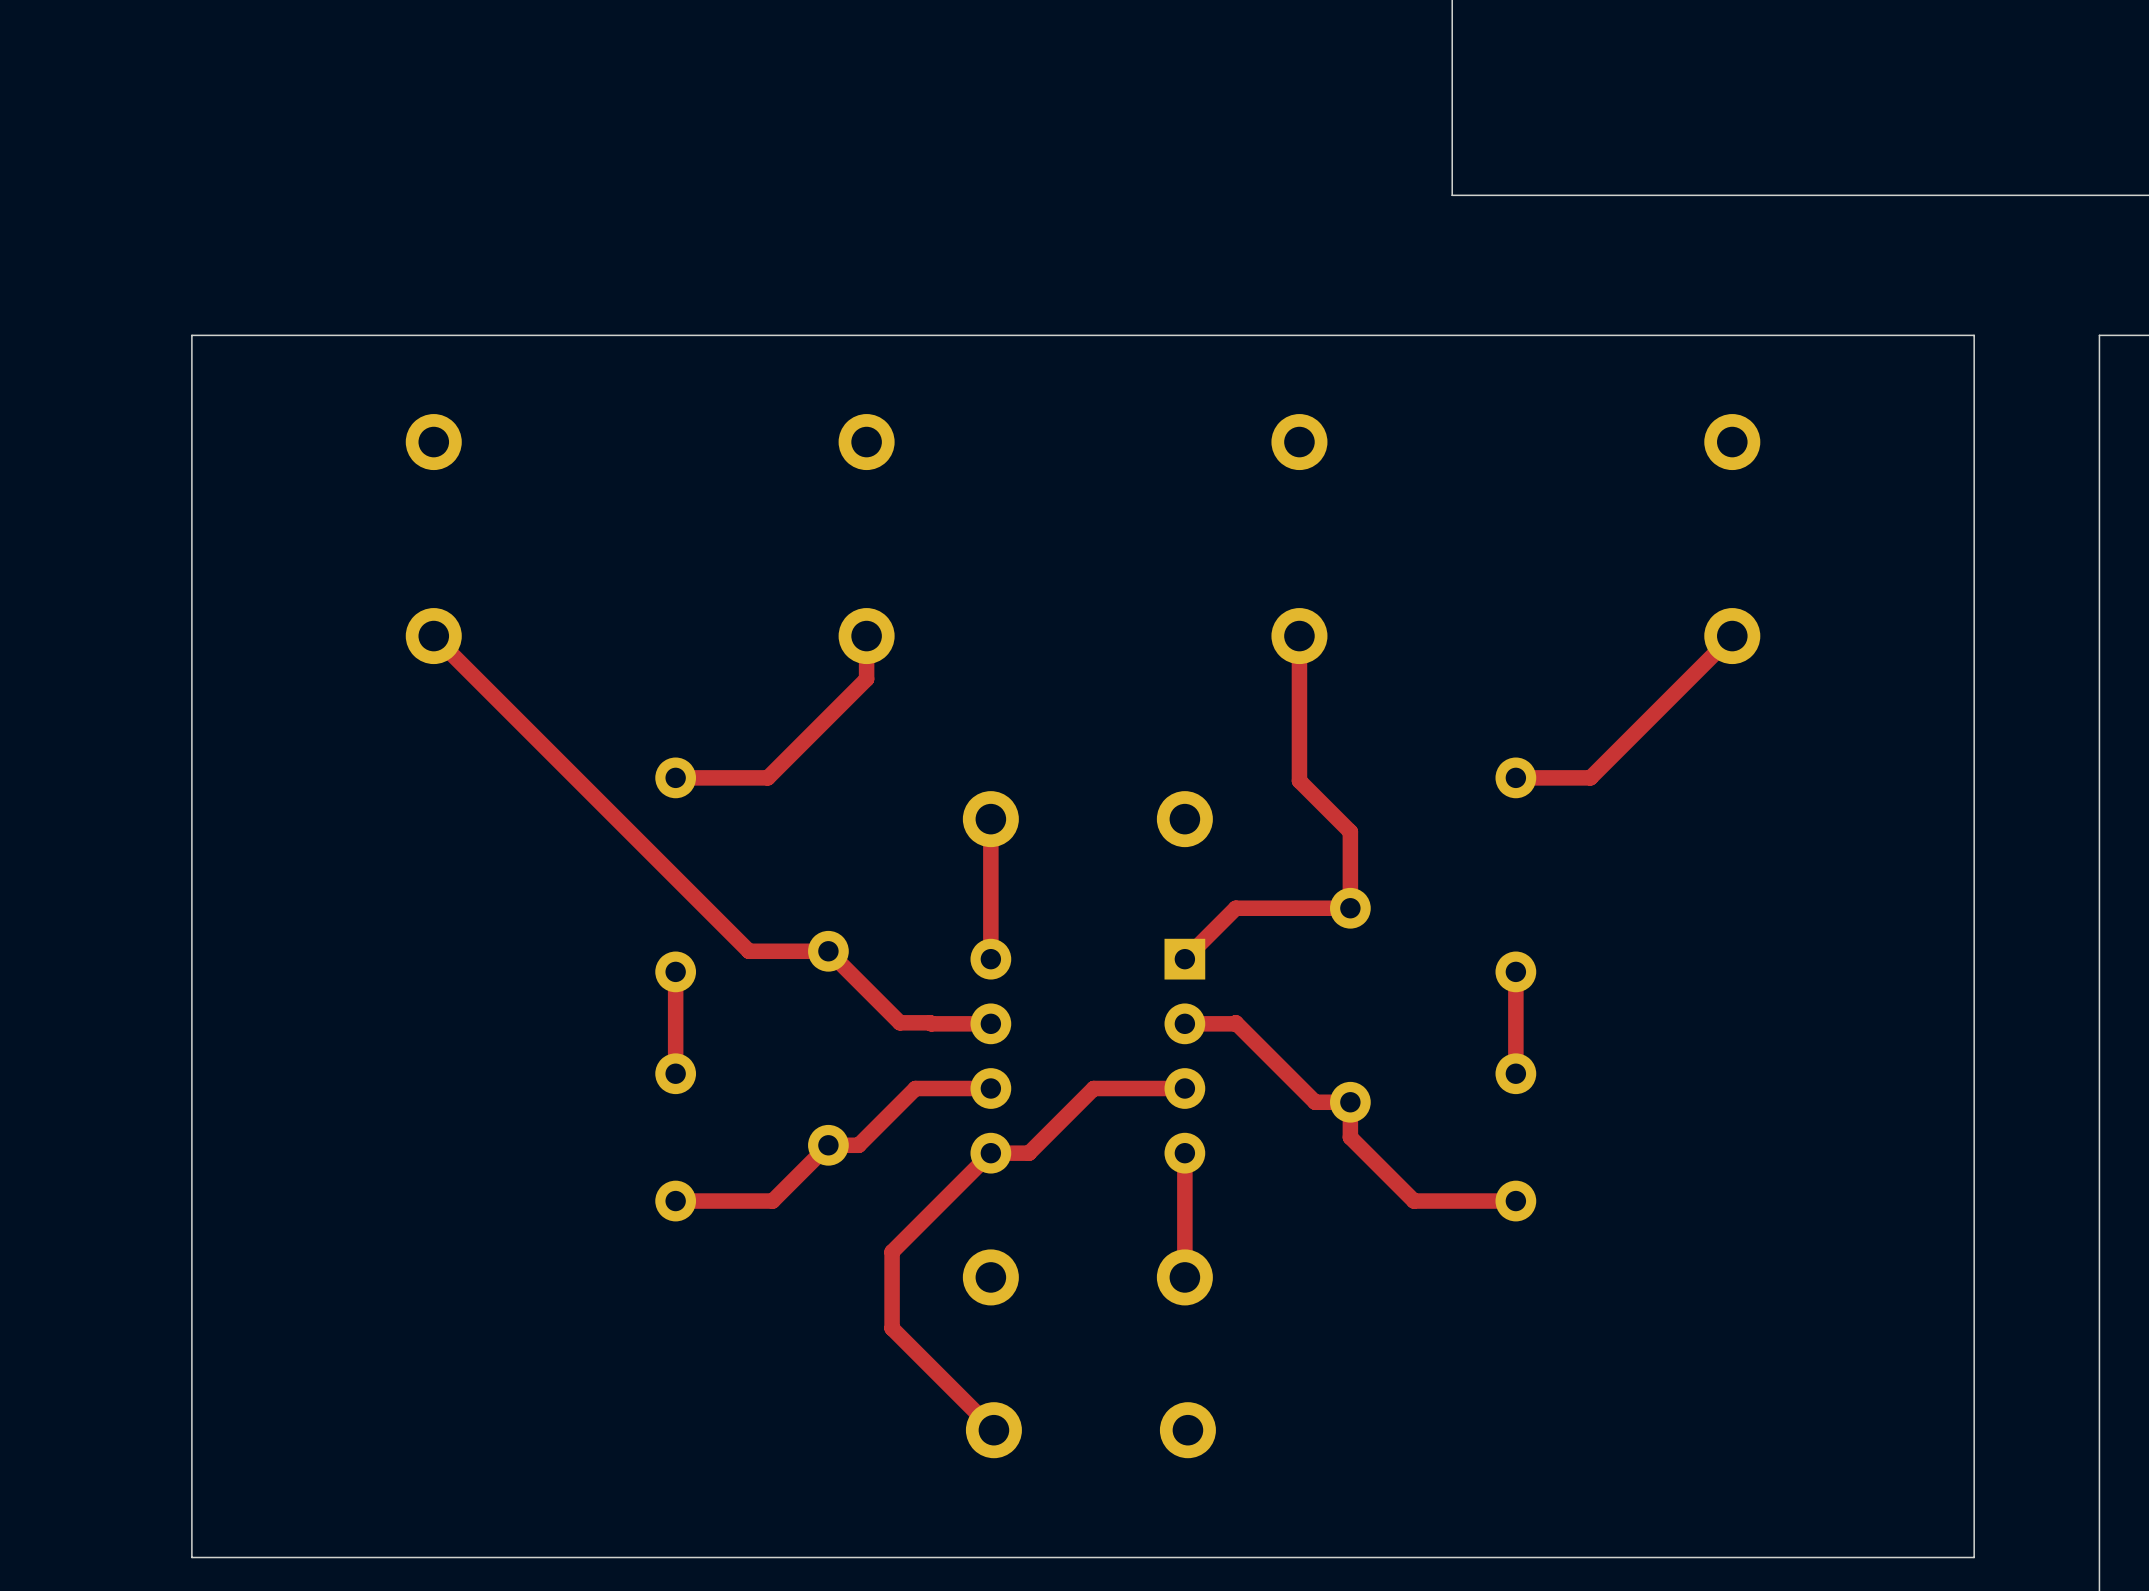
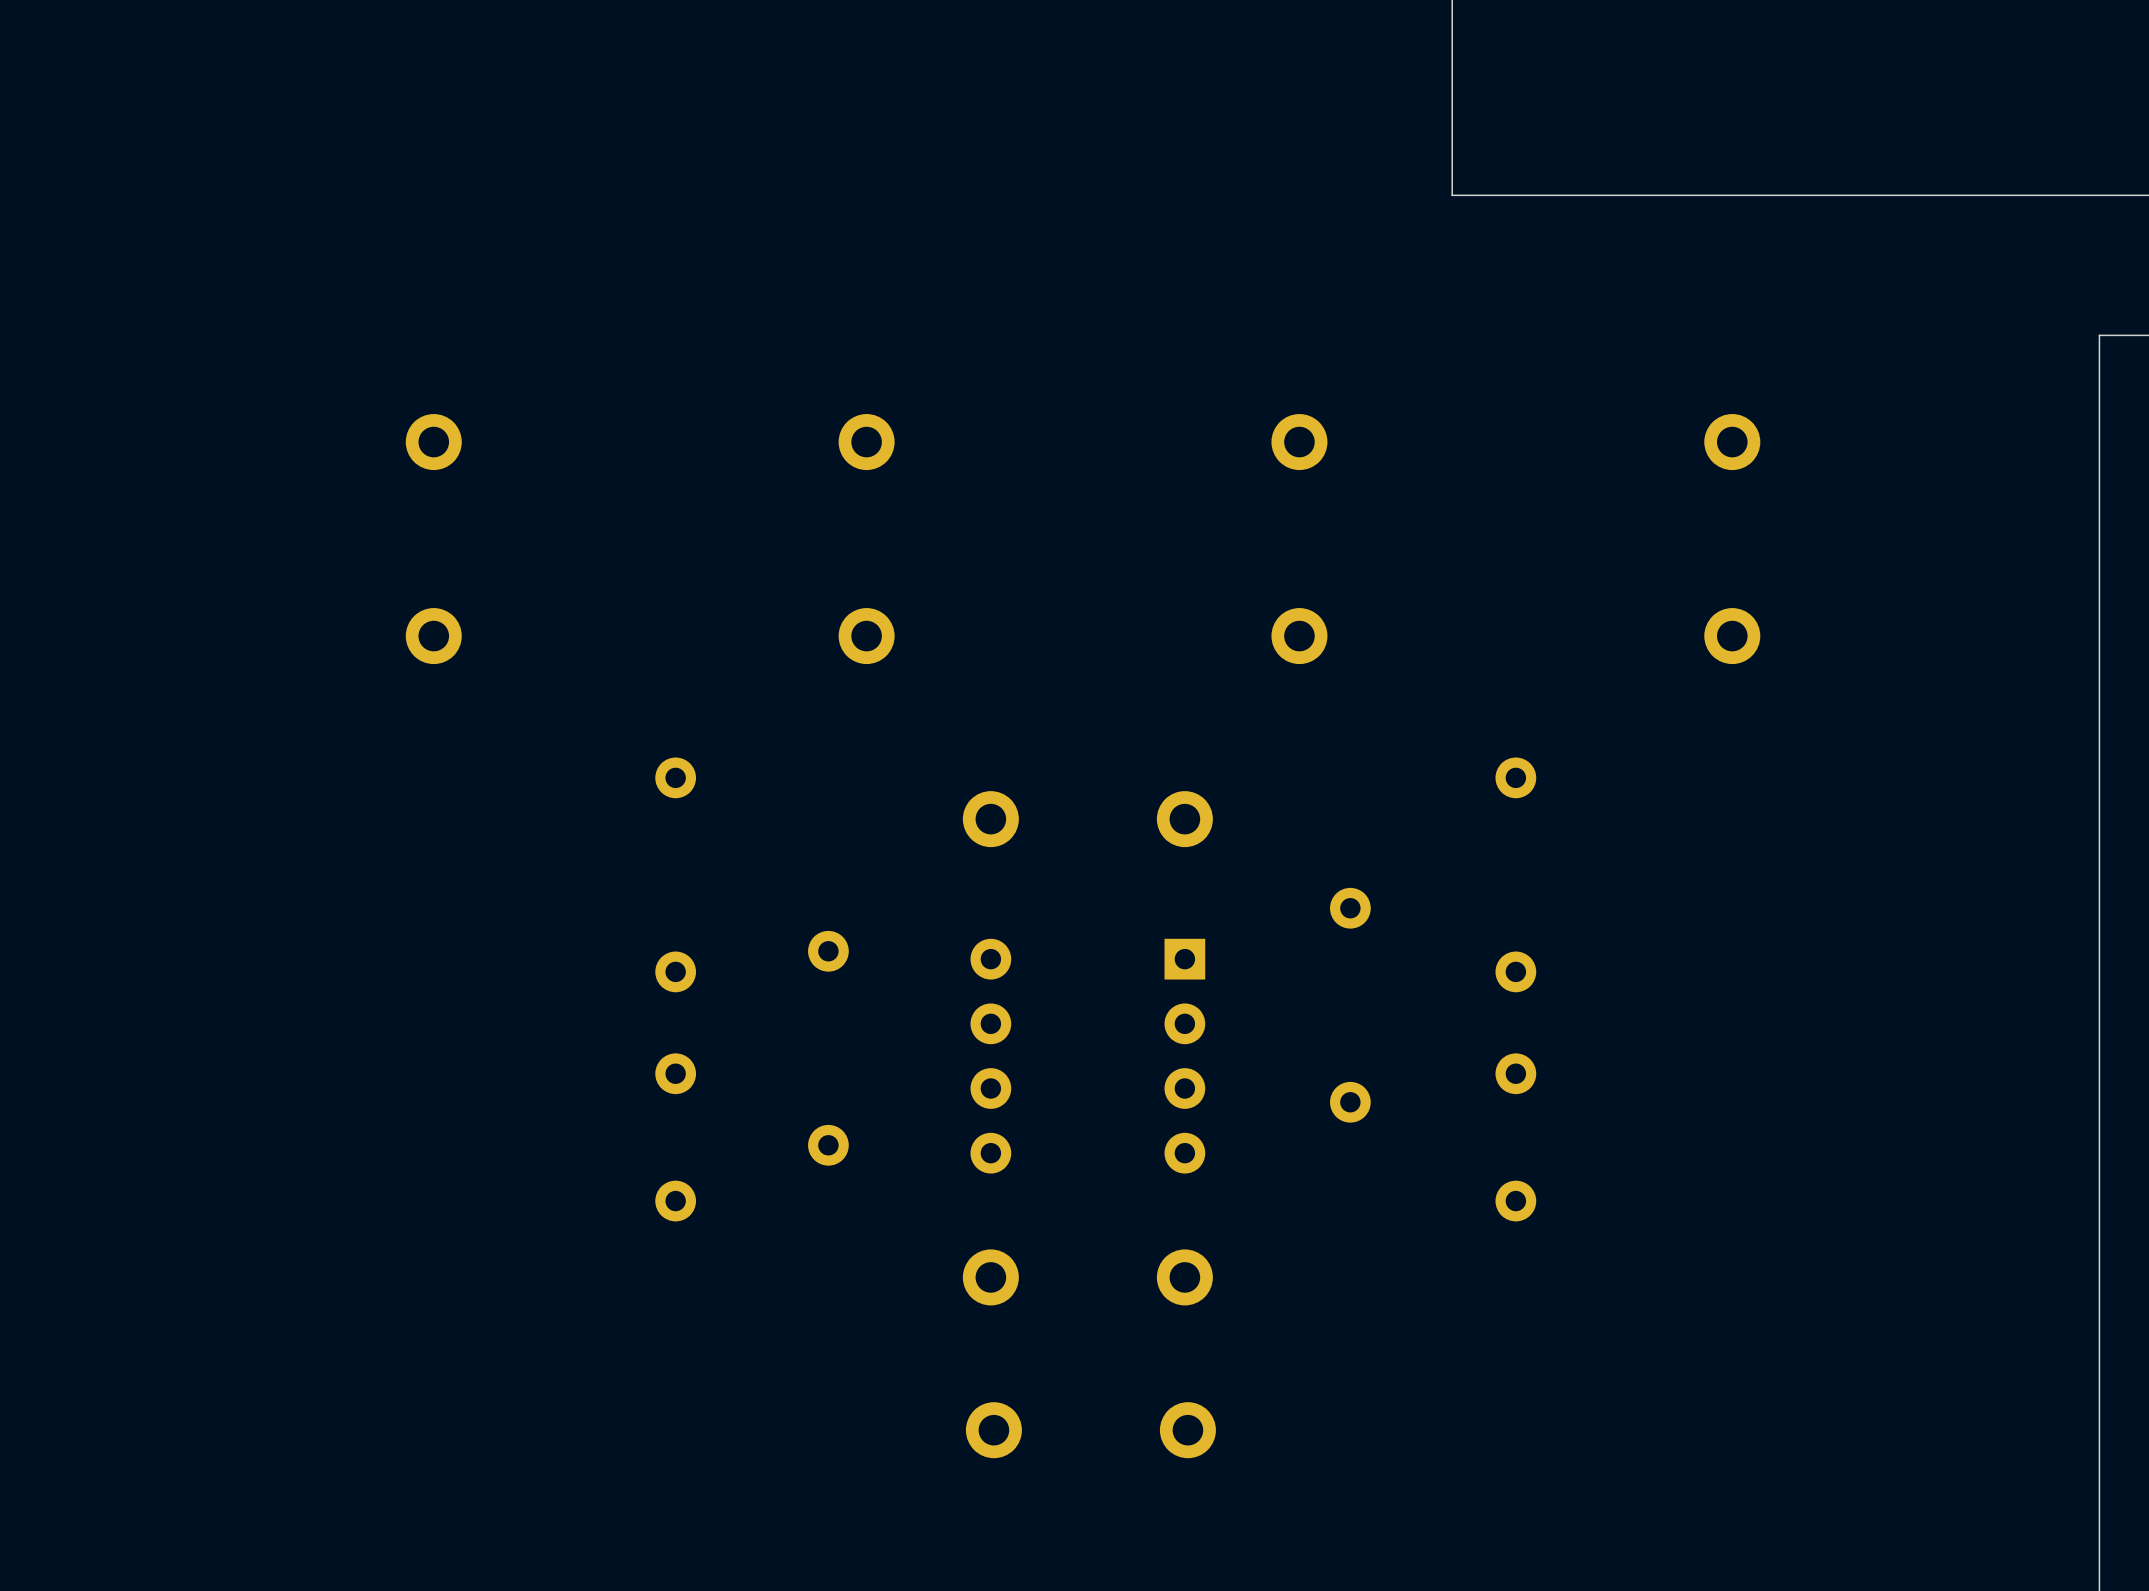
board edge: (1974, 335) (191, 335) (191, 1557) (1974, 1557) (1974, 335) -> none
top track: (433, 636) (748, 951) (828, 951) (899, 1022) (990, 1023) -> none
top track: (866, 636) (866, 679) (767, 777) (675, 777) -> none
top track: (1299, 636) (1299, 780) (1350, 831) (1350, 908) (1235, 908) (1184, 959) -> none
top track: (1732, 636) (1590, 777) (1515, 777) -> none
top track: (990, 819) (990, 959) -> none
top track: (675, 971) (675, 1073) -> none
top track: (1515, 971) (1515, 1073) -> none
top track: (1185, 1022) (1235, 1022) (1315, 1102) (1350, 1102) (1350, 1137) (1414, 1201) (1515, 1201) -> none
top track: (990, 1088) (915, 1088) (858, 1145) (828, 1145) (772, 1201) (675, 1201) -> none
top track: (1184, 1088) (1093, 1088) (1029, 1153) (990, 1153) (892, 1251) (892, 1328) (993, 1430) -> none
top track: (1184, 1153) (1184, 1277) -> none

